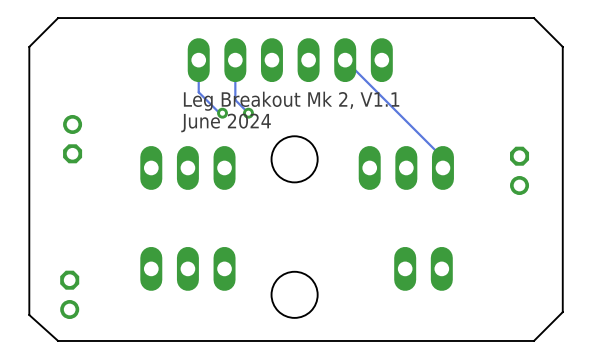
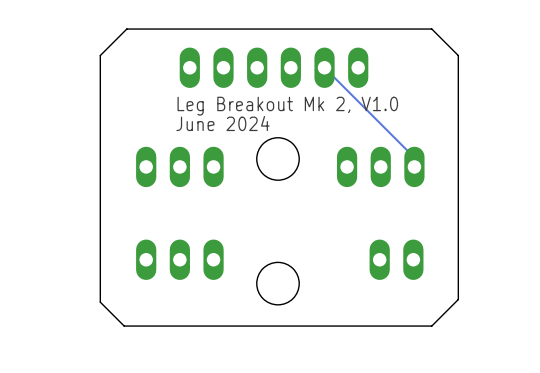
board edge: (130, 18) (58, 18) (29, 46) (29, 315) (58, 340) (127, 340) -> (126, 29) (100, 55) (100, 302) (124, 326)
board edge: (461, 18) (533, 18) (562, 46) (562, 312) (533, 340) (461, 340) -> (431, 29) (458, 55) (458, 299) (431, 326)
track: (198, 60) (198, 92) (219, 113) (222, 113) -> none
track: (235, 60) (235, 100) (248, 113) -> none
text: Leg Breakout Mk 2, V1.1 (291, 101) -> Leg Breakout Mk 2, V1.0 (287, 106)
via: (222, 113) -> none
via: (248, 113) -> none
part: (72, 139) -> none
part: (519, 170) -> none
part: (69, 294) -> none

